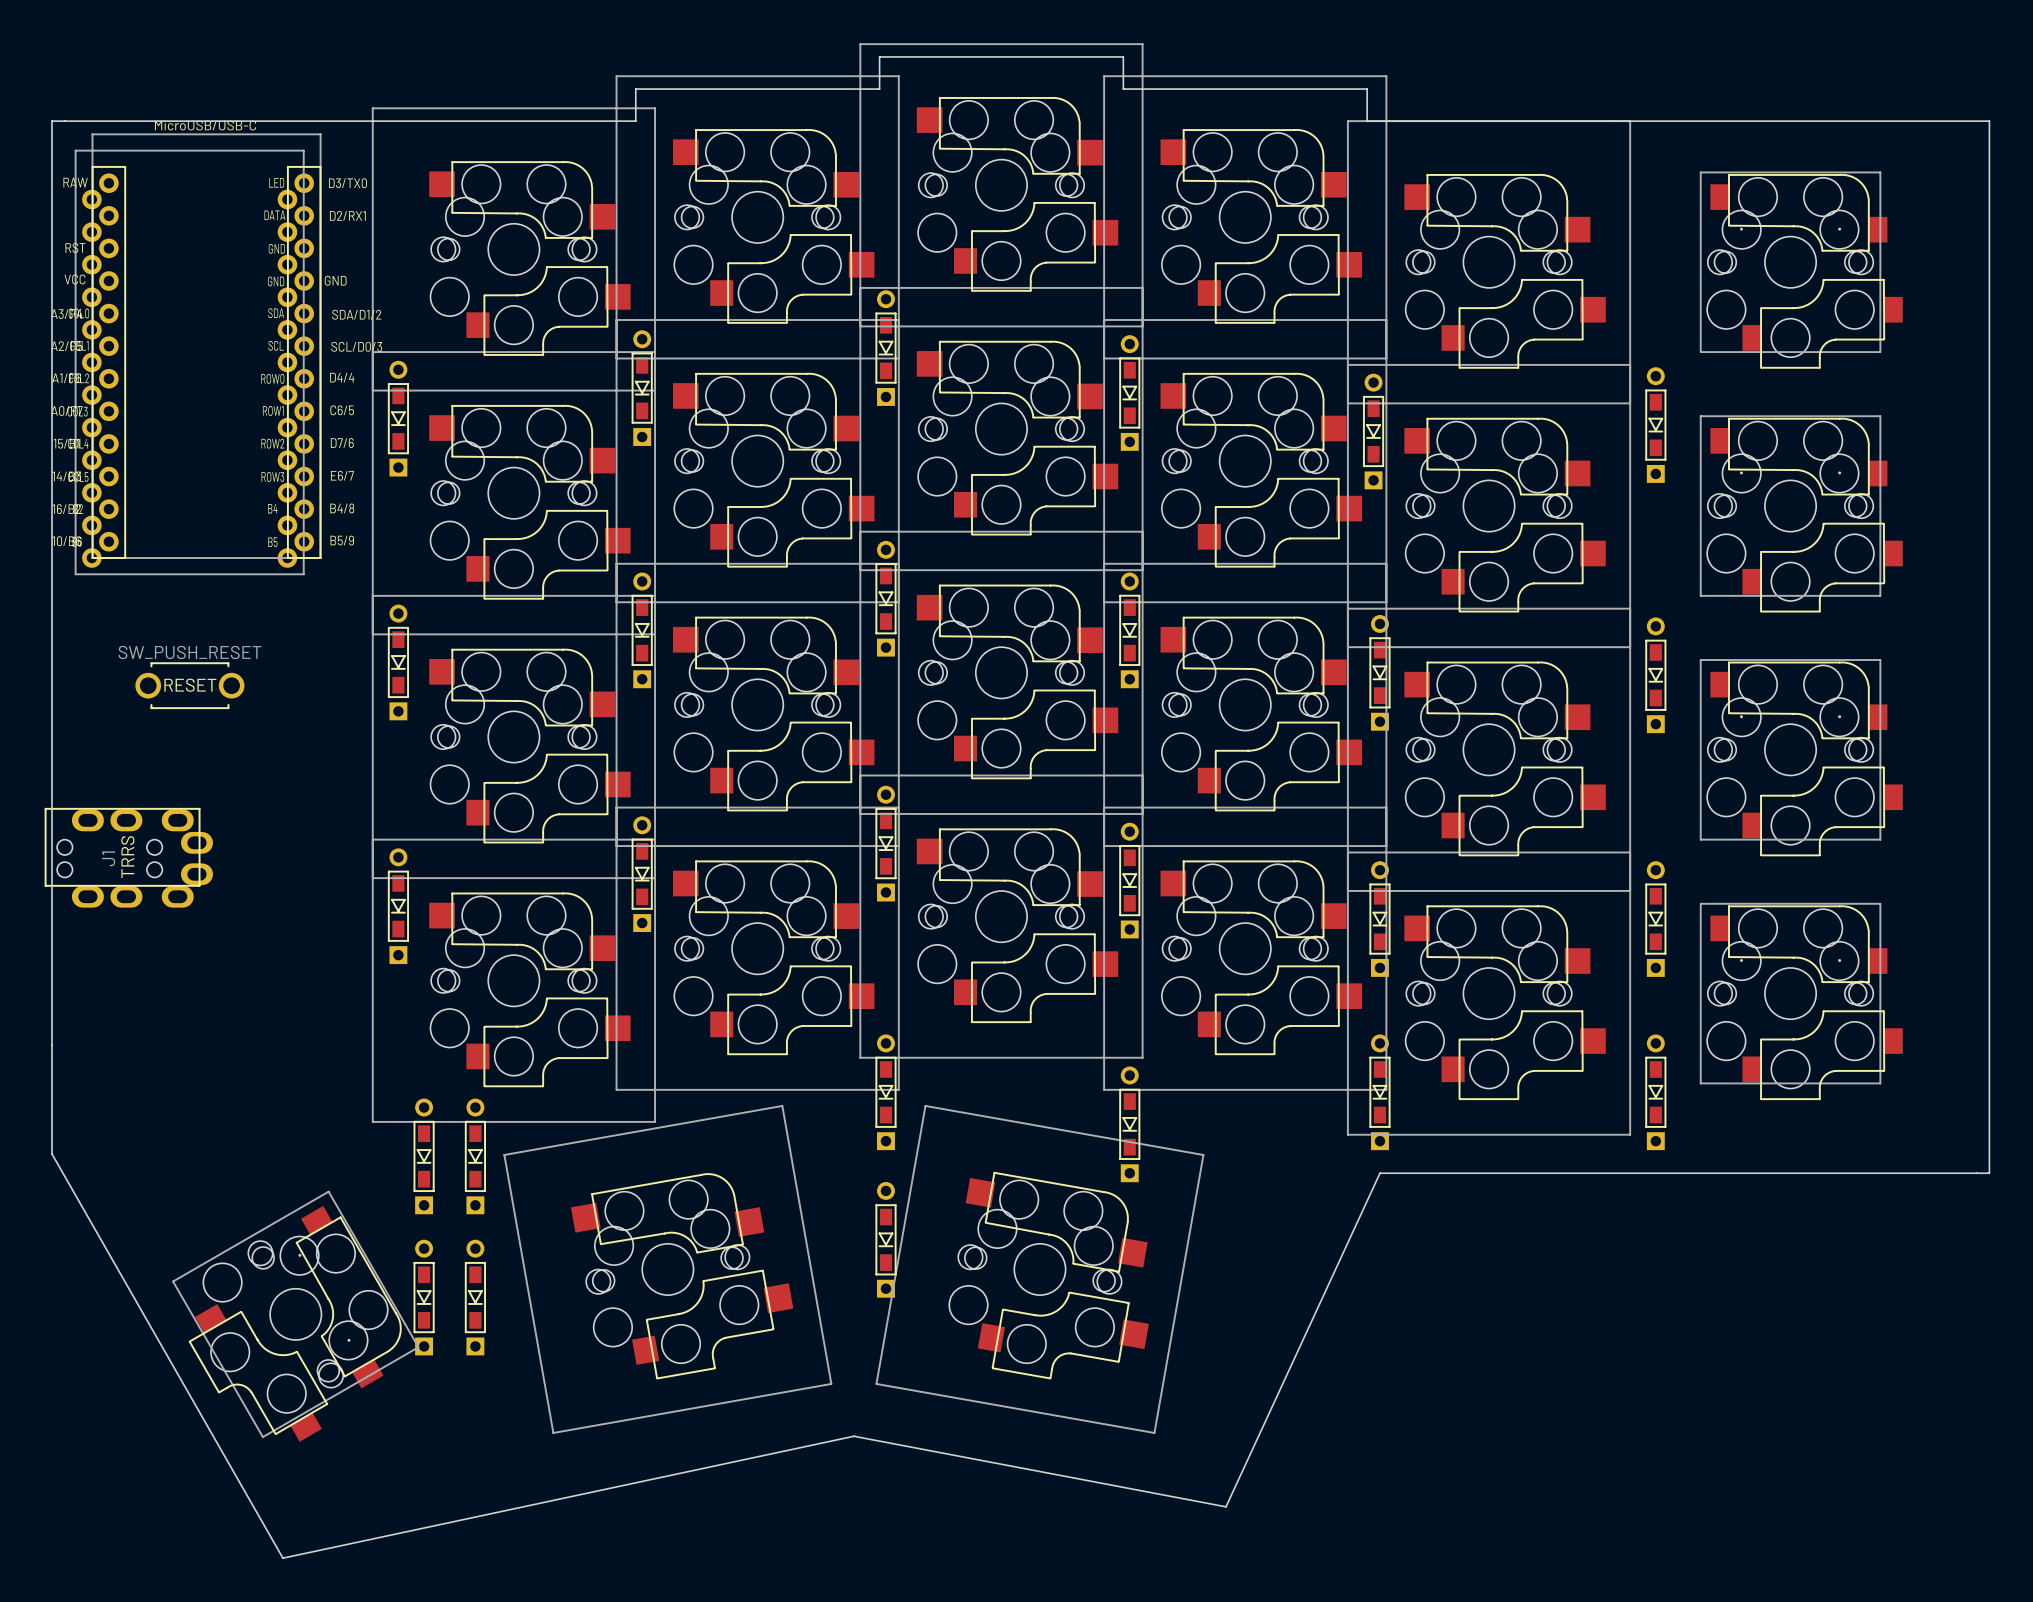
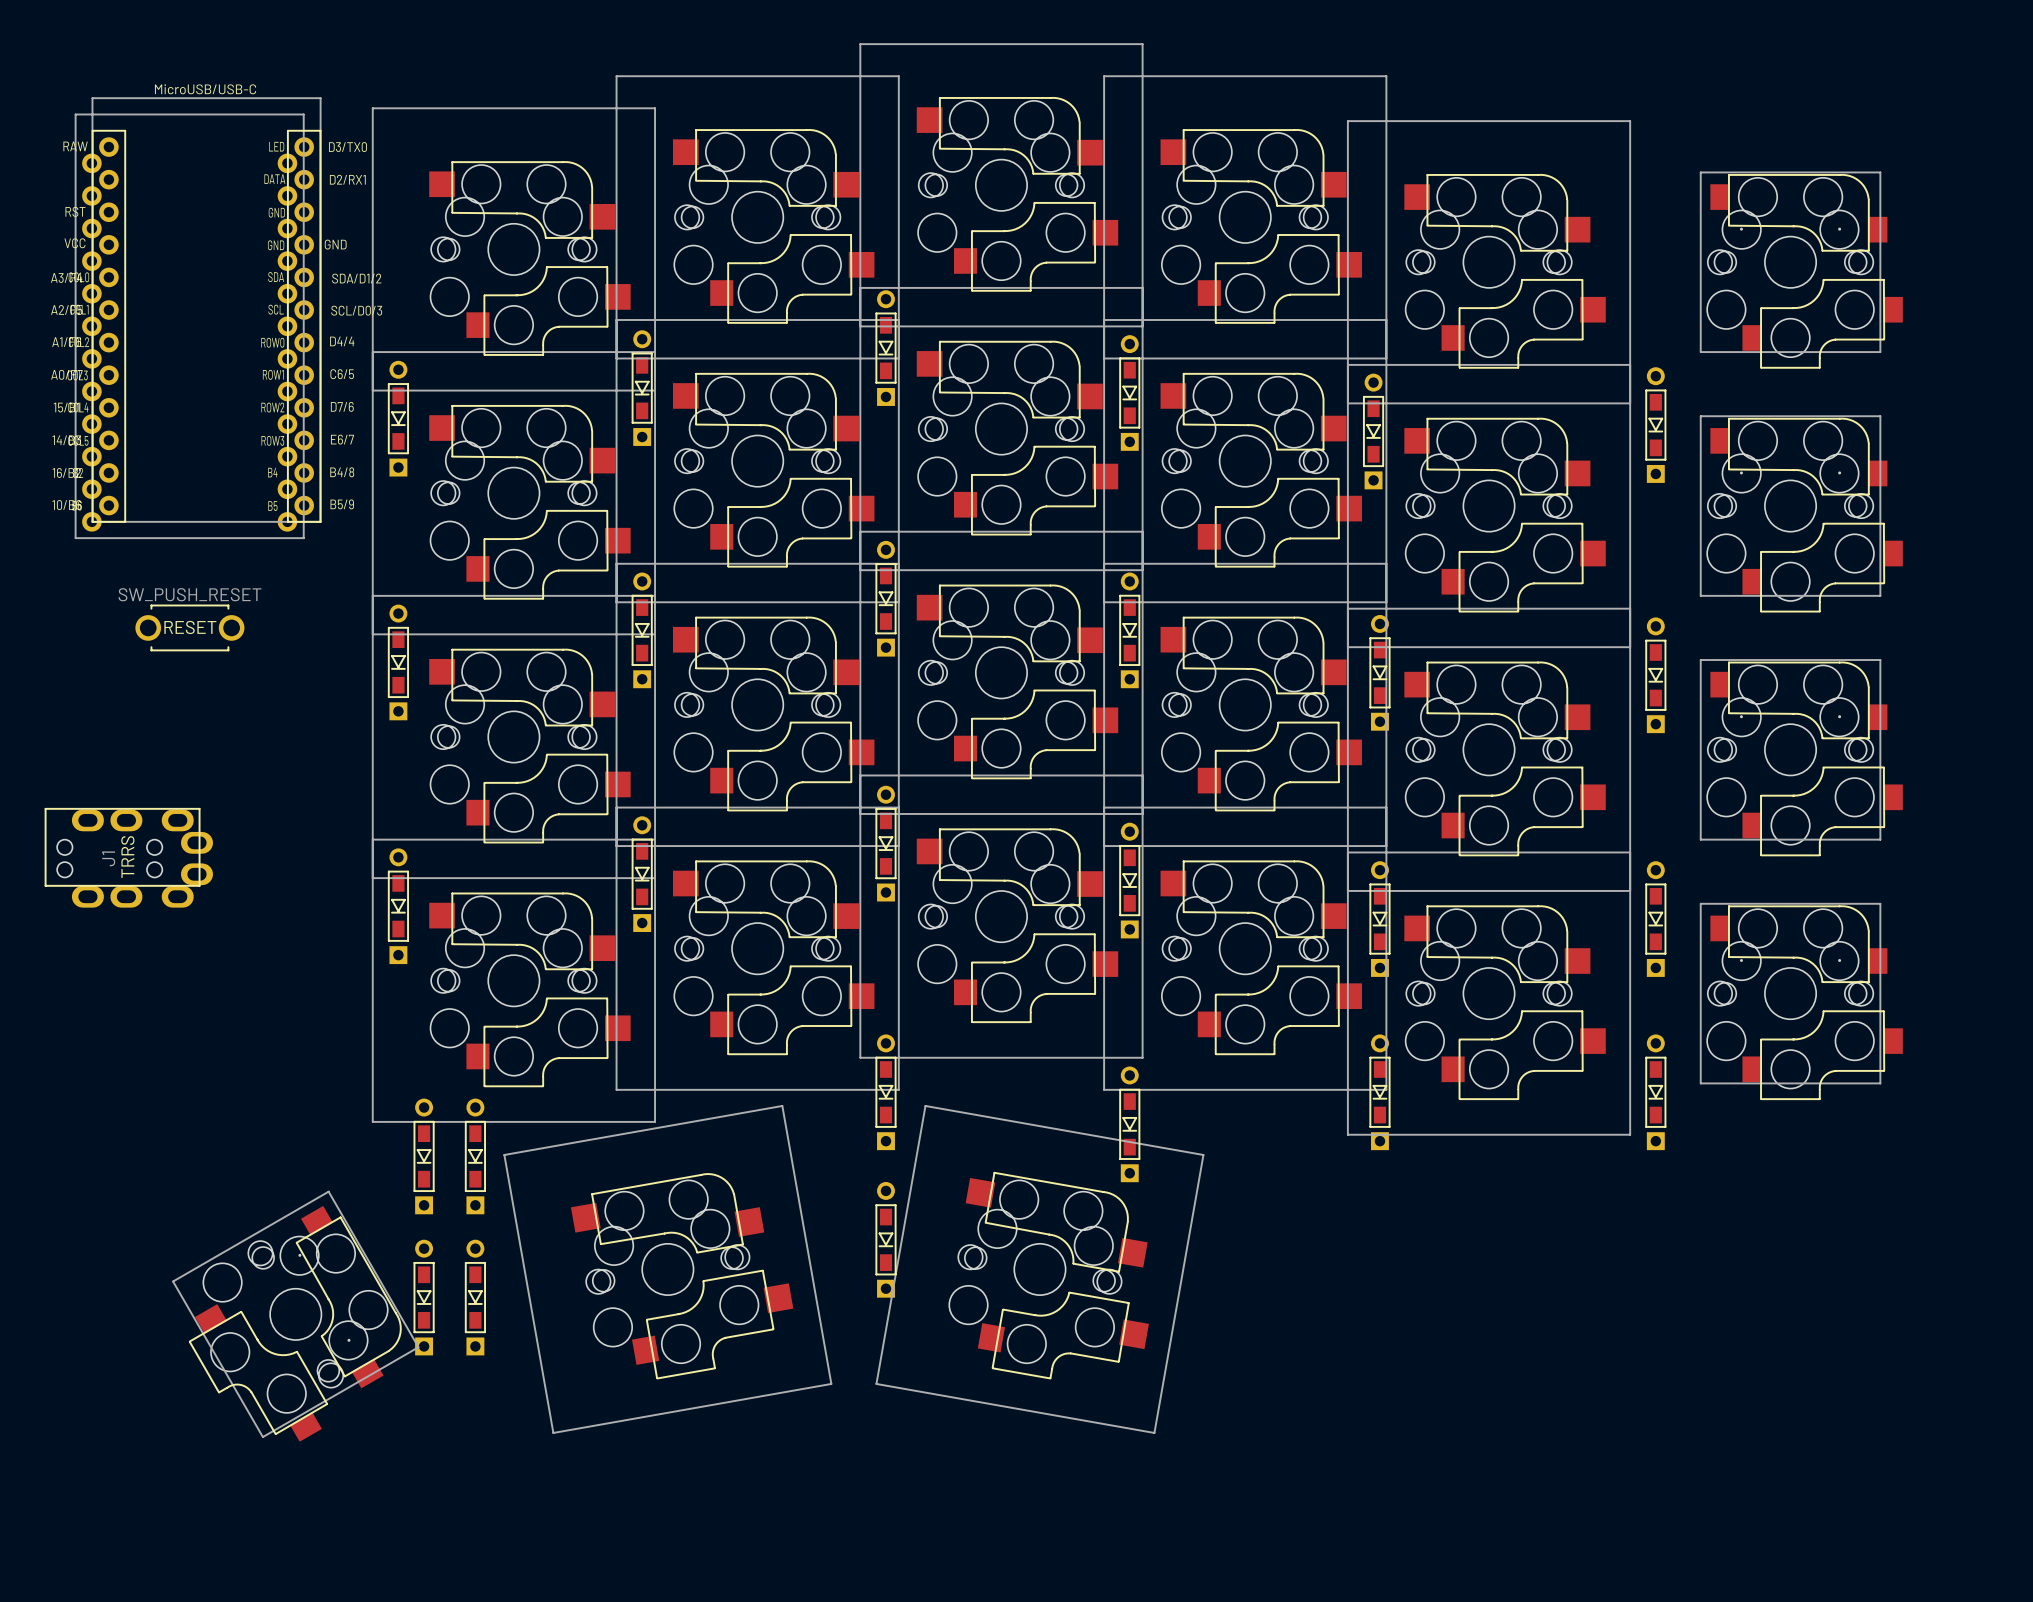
board edge: (879, 56) (879, 89) (635, 89) (635, 121) (51, 121) (51, 1153) (282, 1558) (853, 1436) (1226, 1506) (1379, 1173) (1989, 1173) (1989, 121) (1367, 121) (1367, 89) (1123, 89) (1123, 56) (879, 56) -> none
part position: (198, 354) -> (198, 318)
part position: (189, 685) -> (189, 627)

